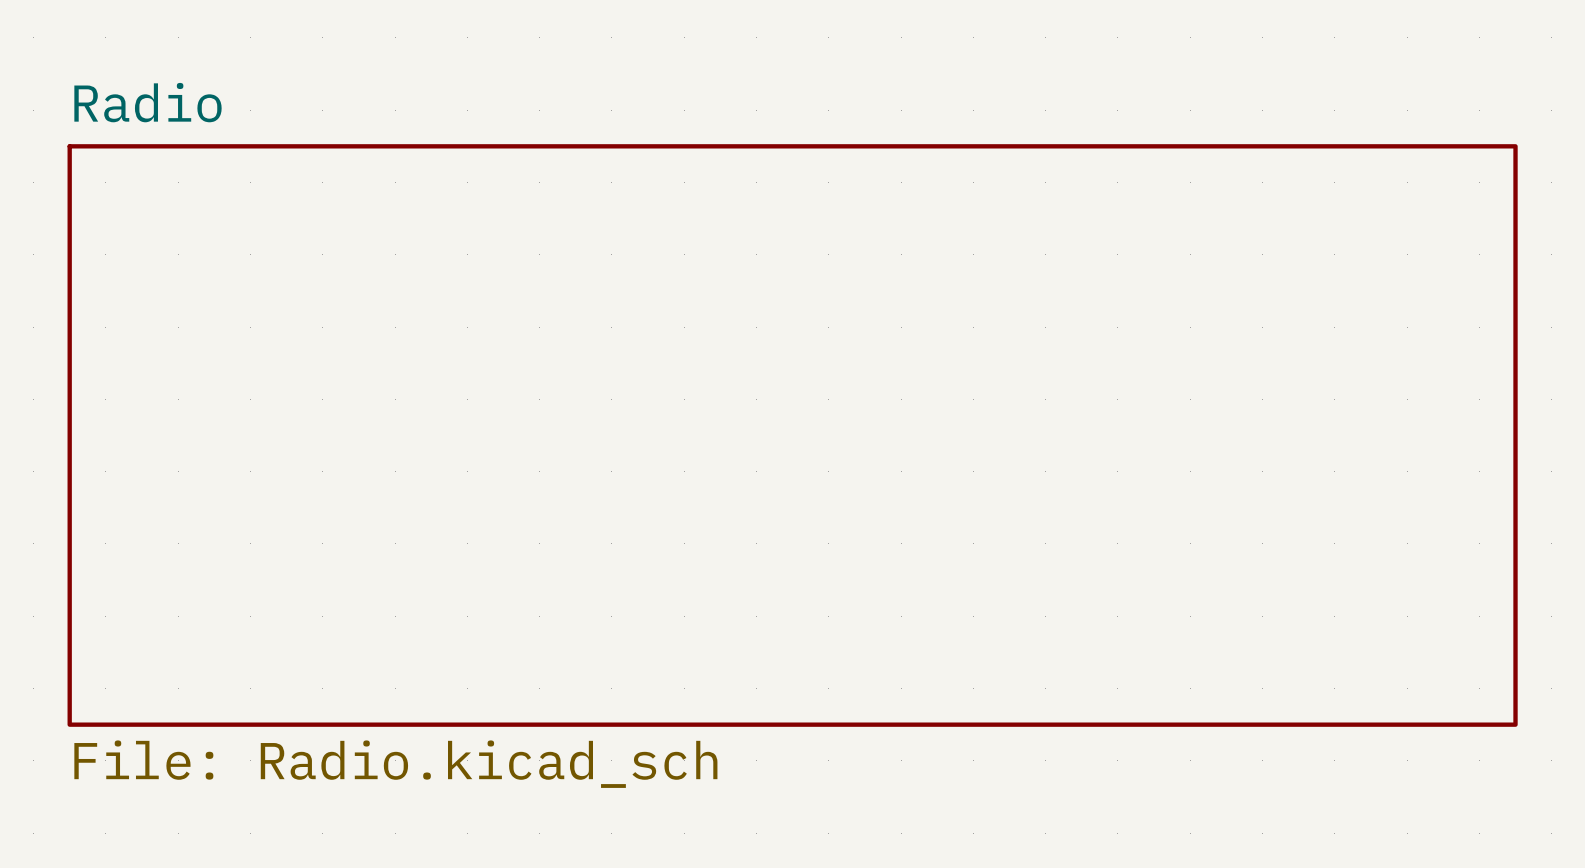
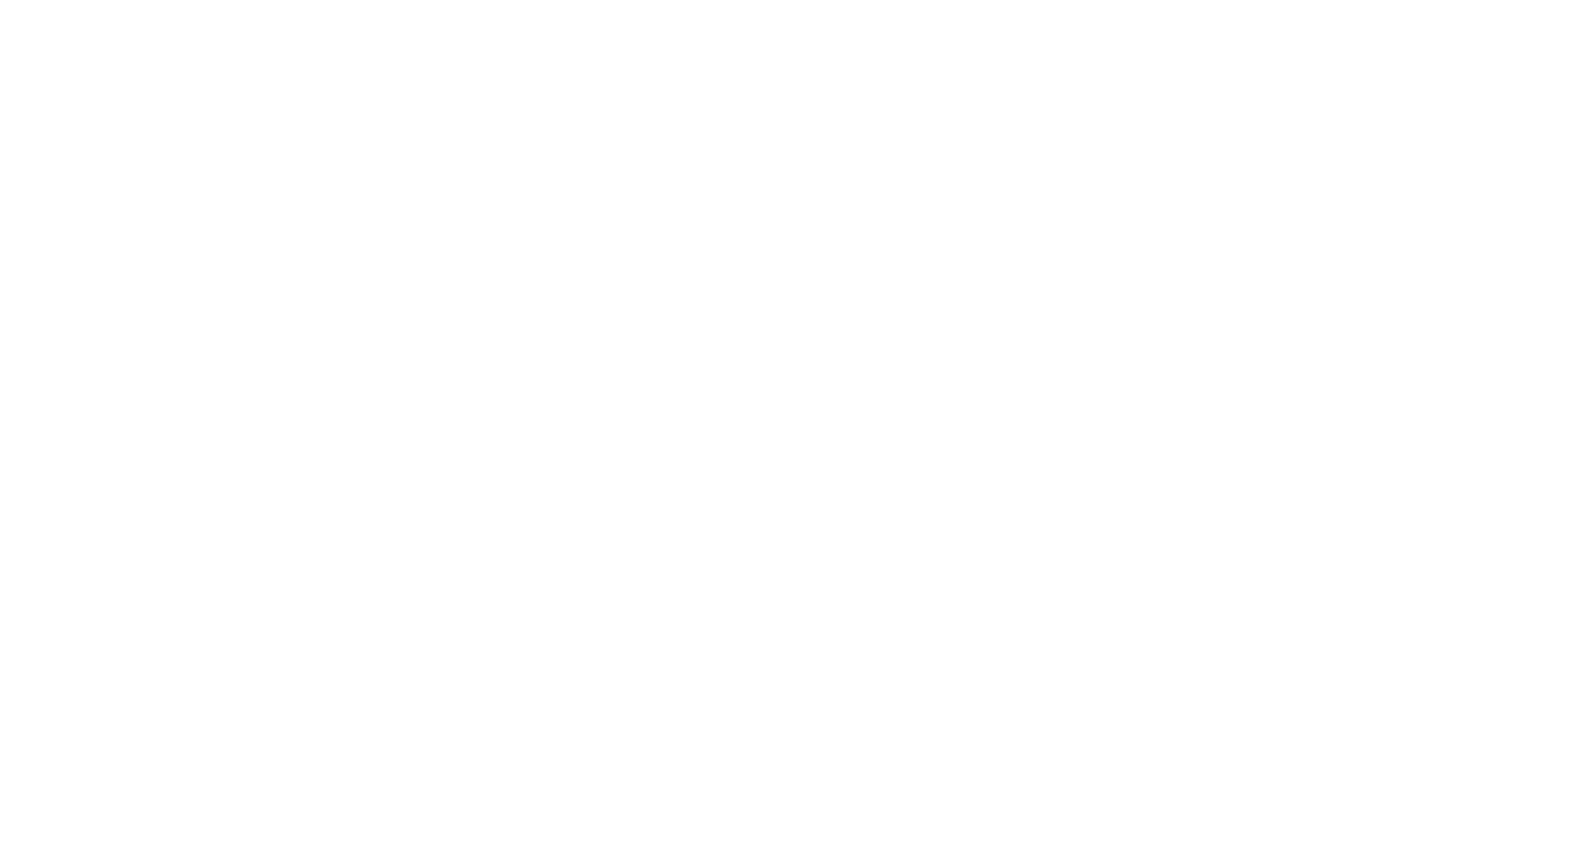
sheet Radio: File: Radio.kicad_sch (792, 435) -> none

